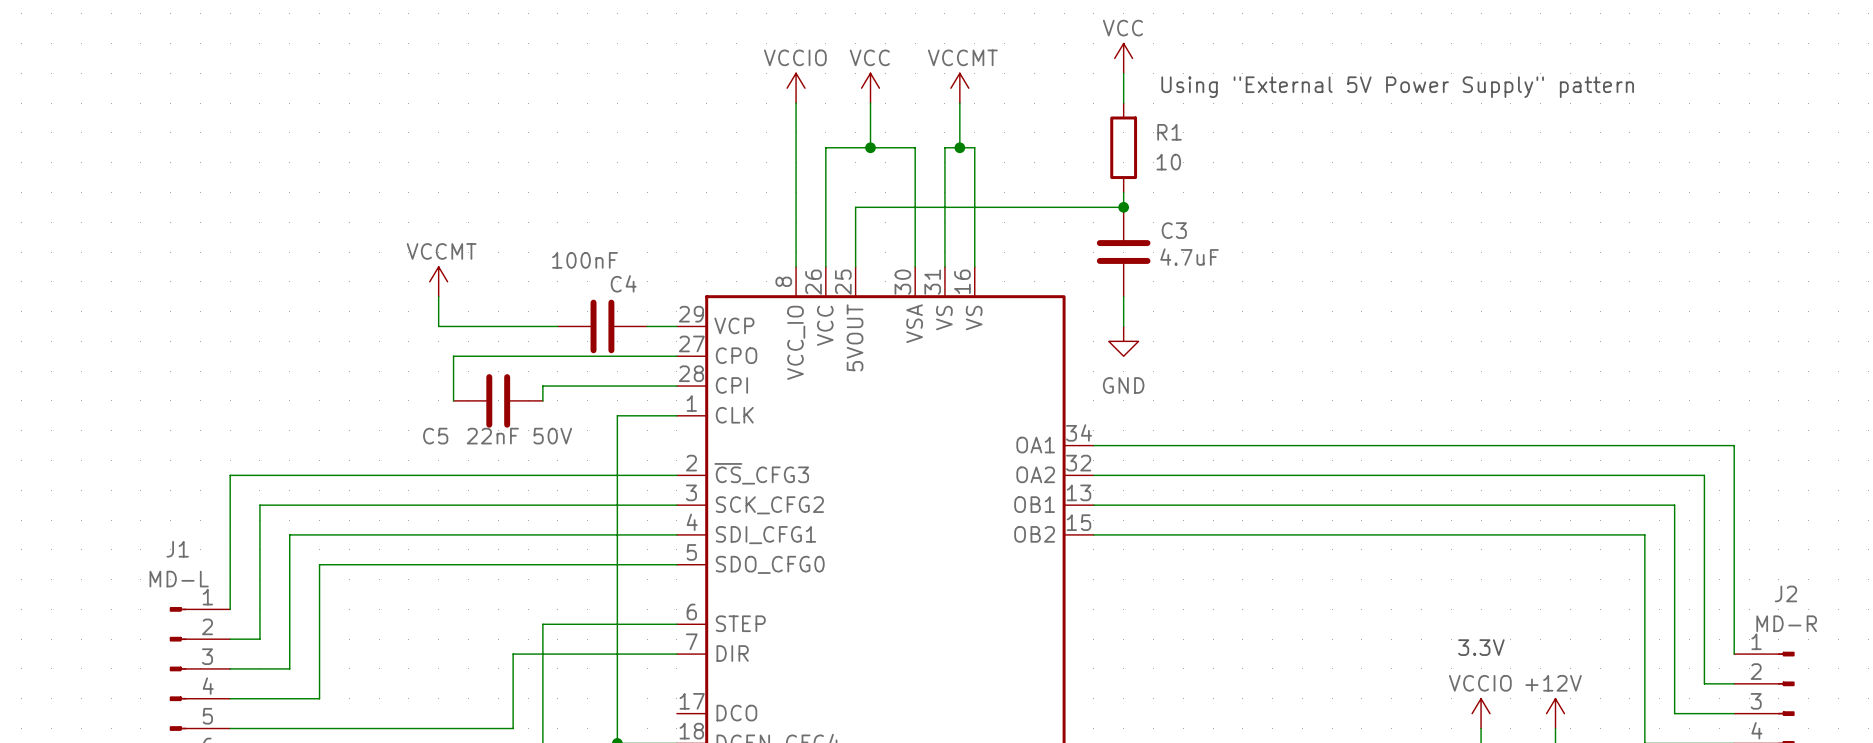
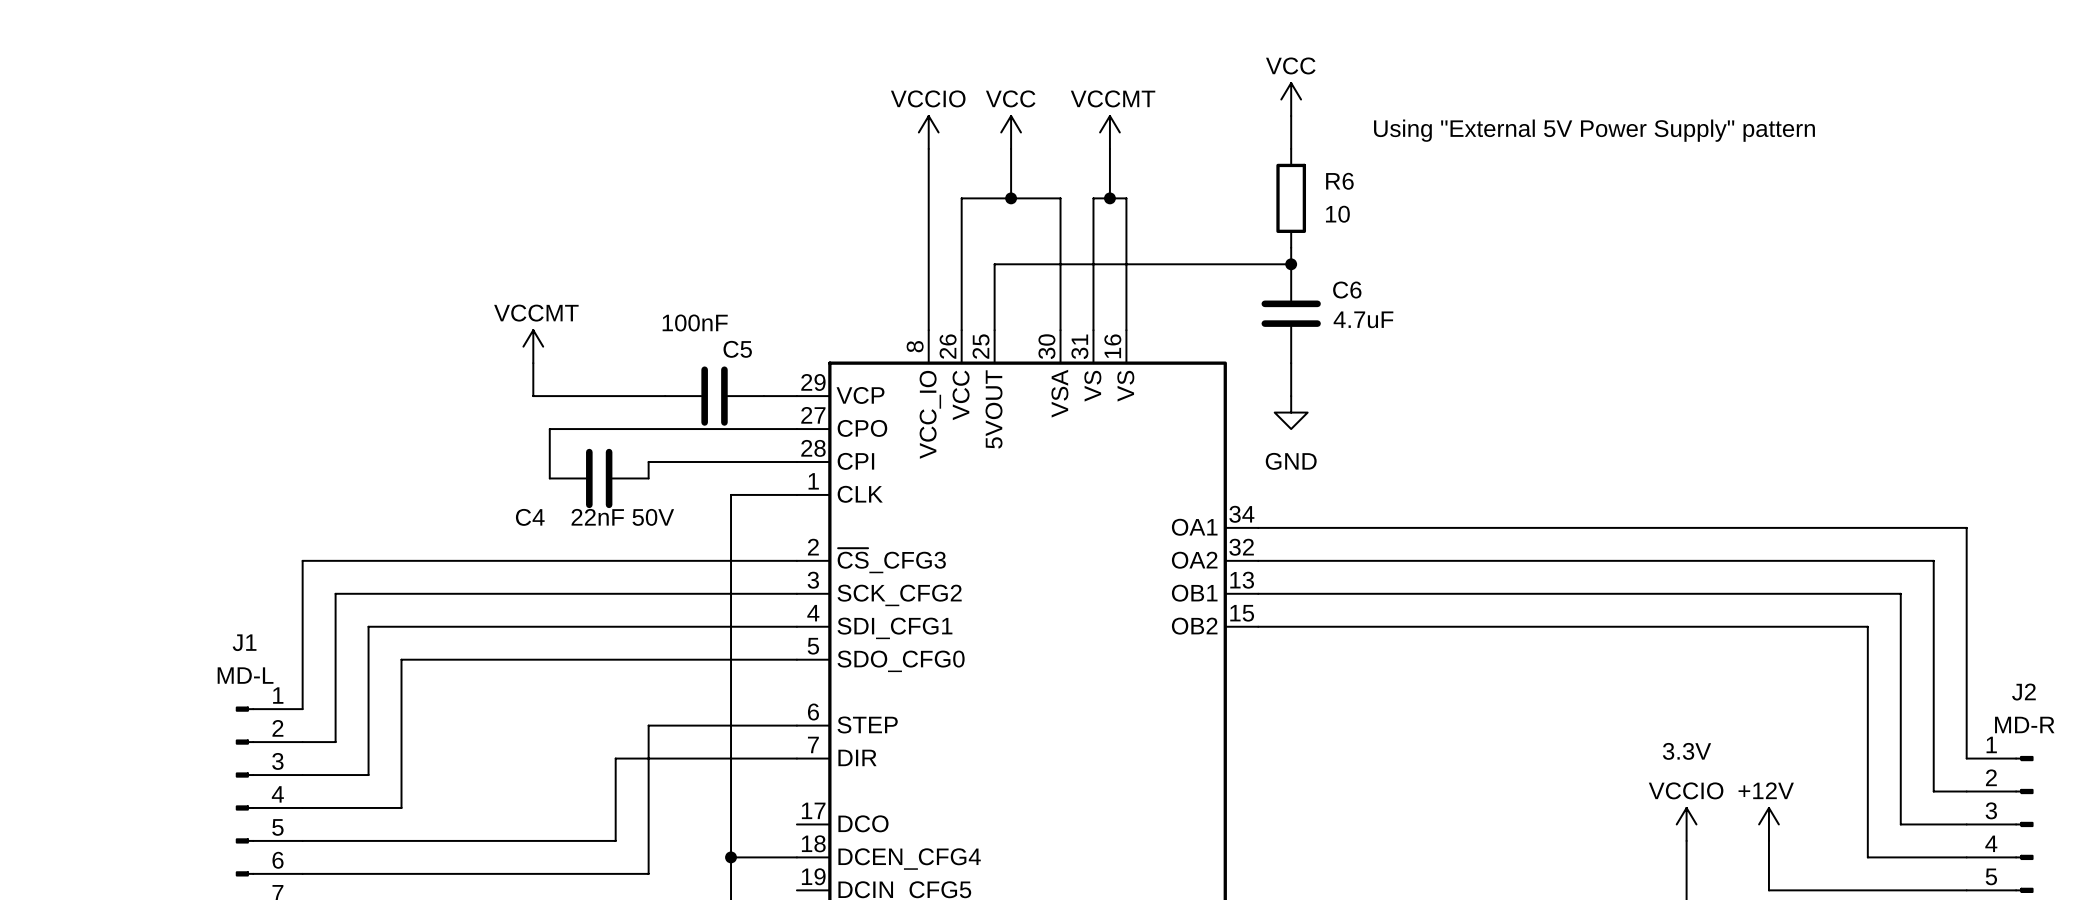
R1 name: R1 (1169, 132) -> R6 (1339, 181)
C3 name: C3 (1174, 230) -> C6 (1347, 290)
C4 name: C4 (623, 283) -> C5 (737, 349)
C5 name: C5 (435, 436) -> C4 (530, 517)

